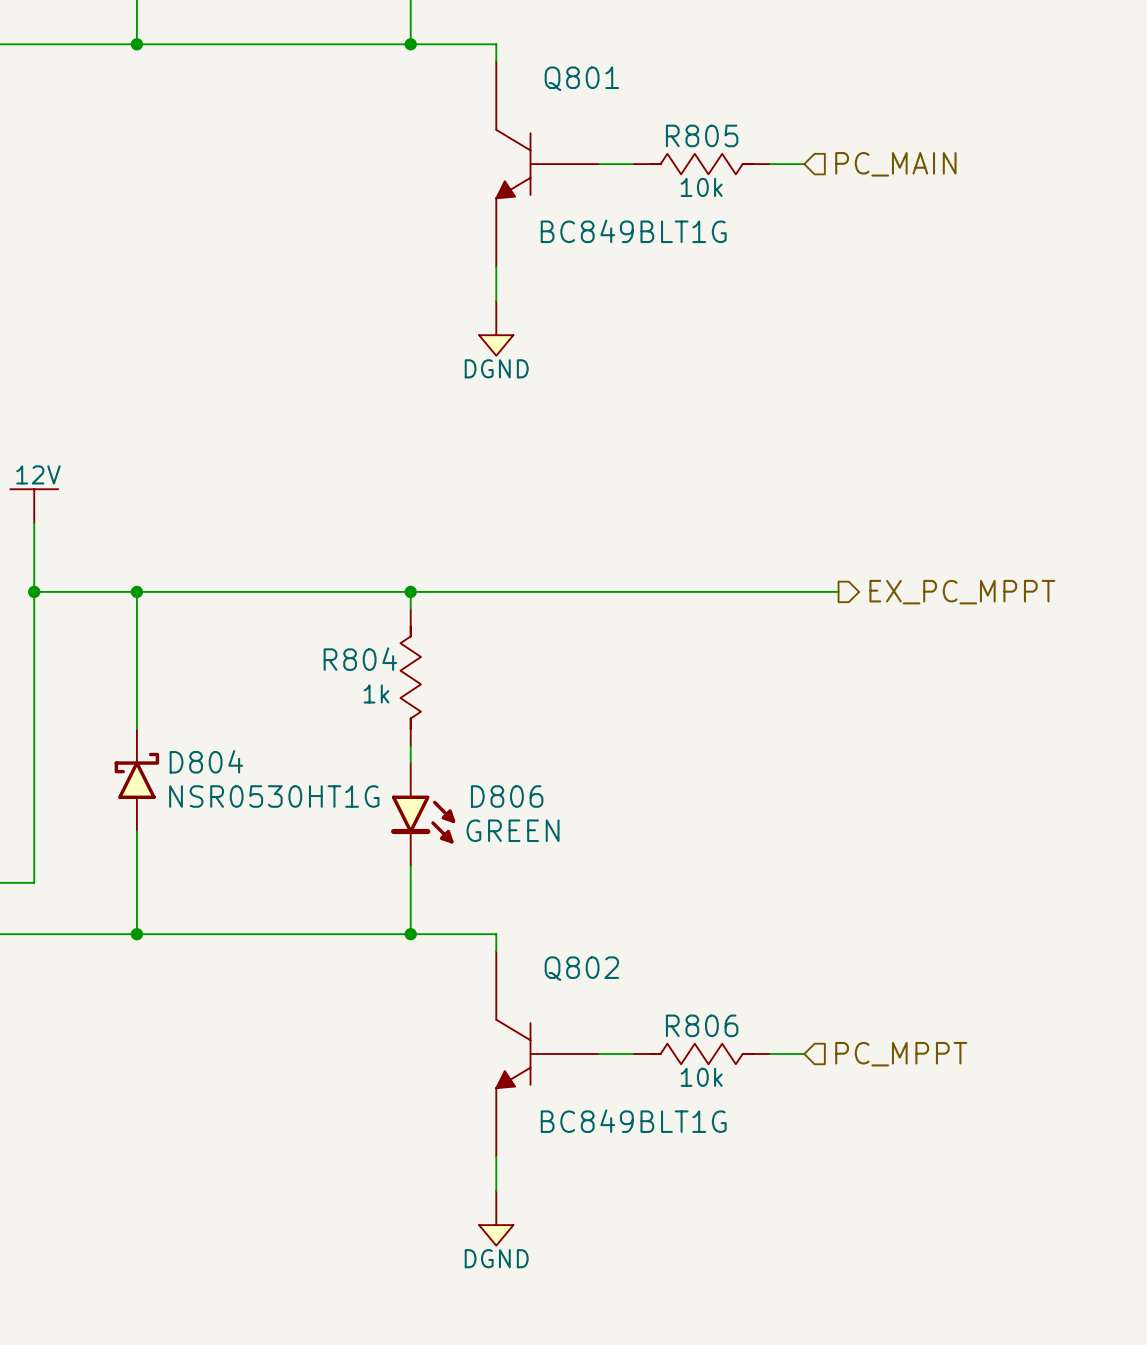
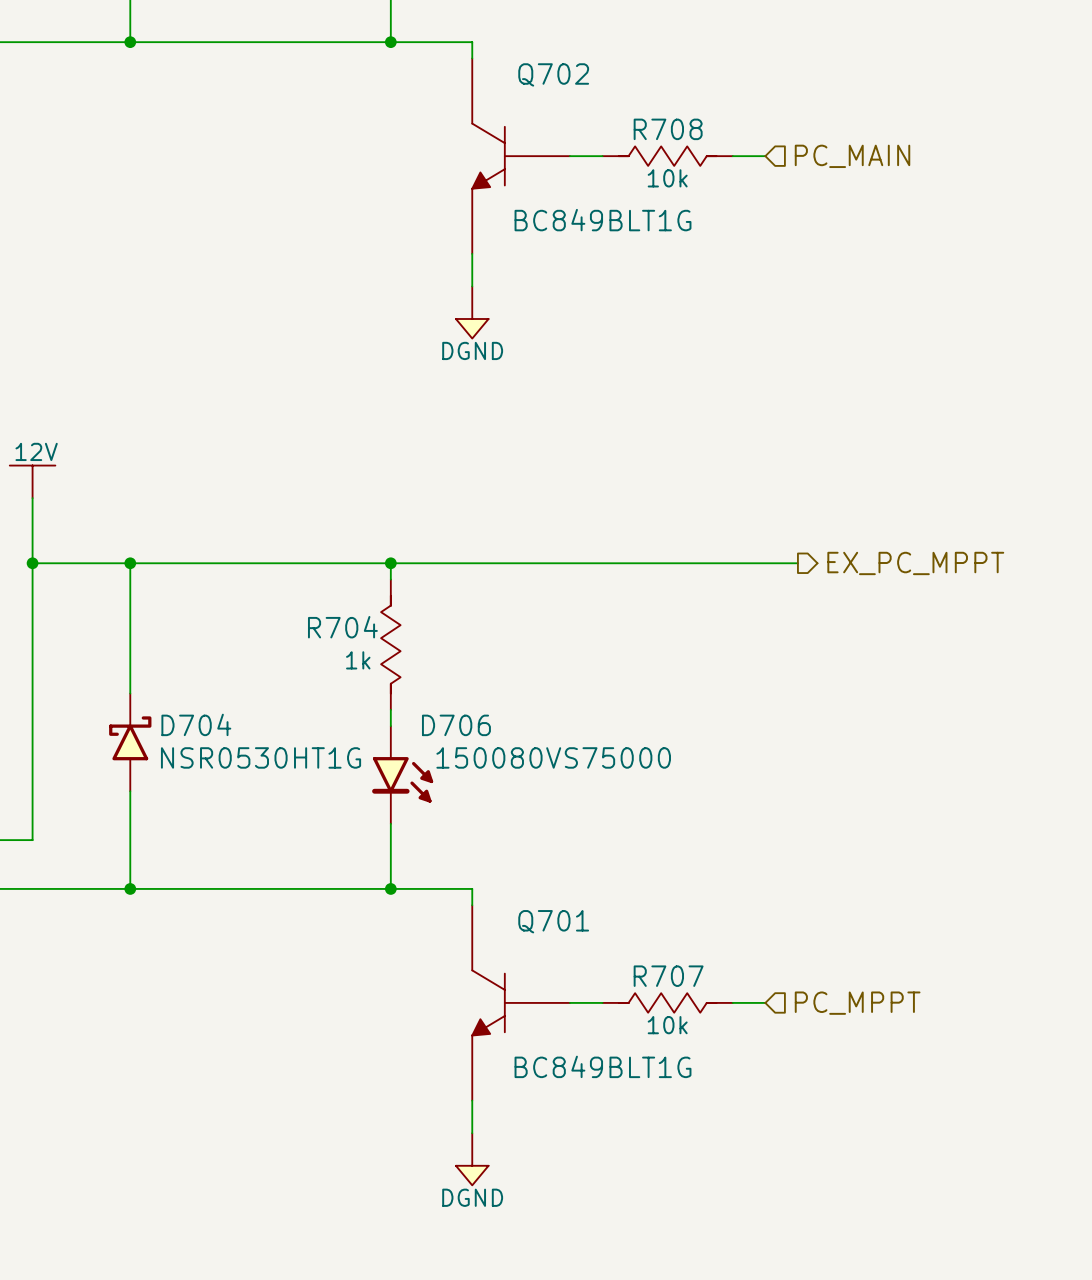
Q801 name: Q801 (581, 78) -> Q702 (553, 74)
R805 name: R805 (702, 135) -> R708 (668, 129)
R804 name: R804 (360, 659) -> R704 (342, 627)
D804 name: D804 (206, 761) -> D704 (196, 724)
D806 name: D806 (507, 796) -> D706 (456, 725)
D806 value: none -> 150080VS75000 (553, 757)
D806 text: GREEN (513, 830) -> none
Q802 name: Q802 (581, 968) -> Q701 (553, 921)
R806 name: R806 (702, 1025) -> R707 (668, 976)

